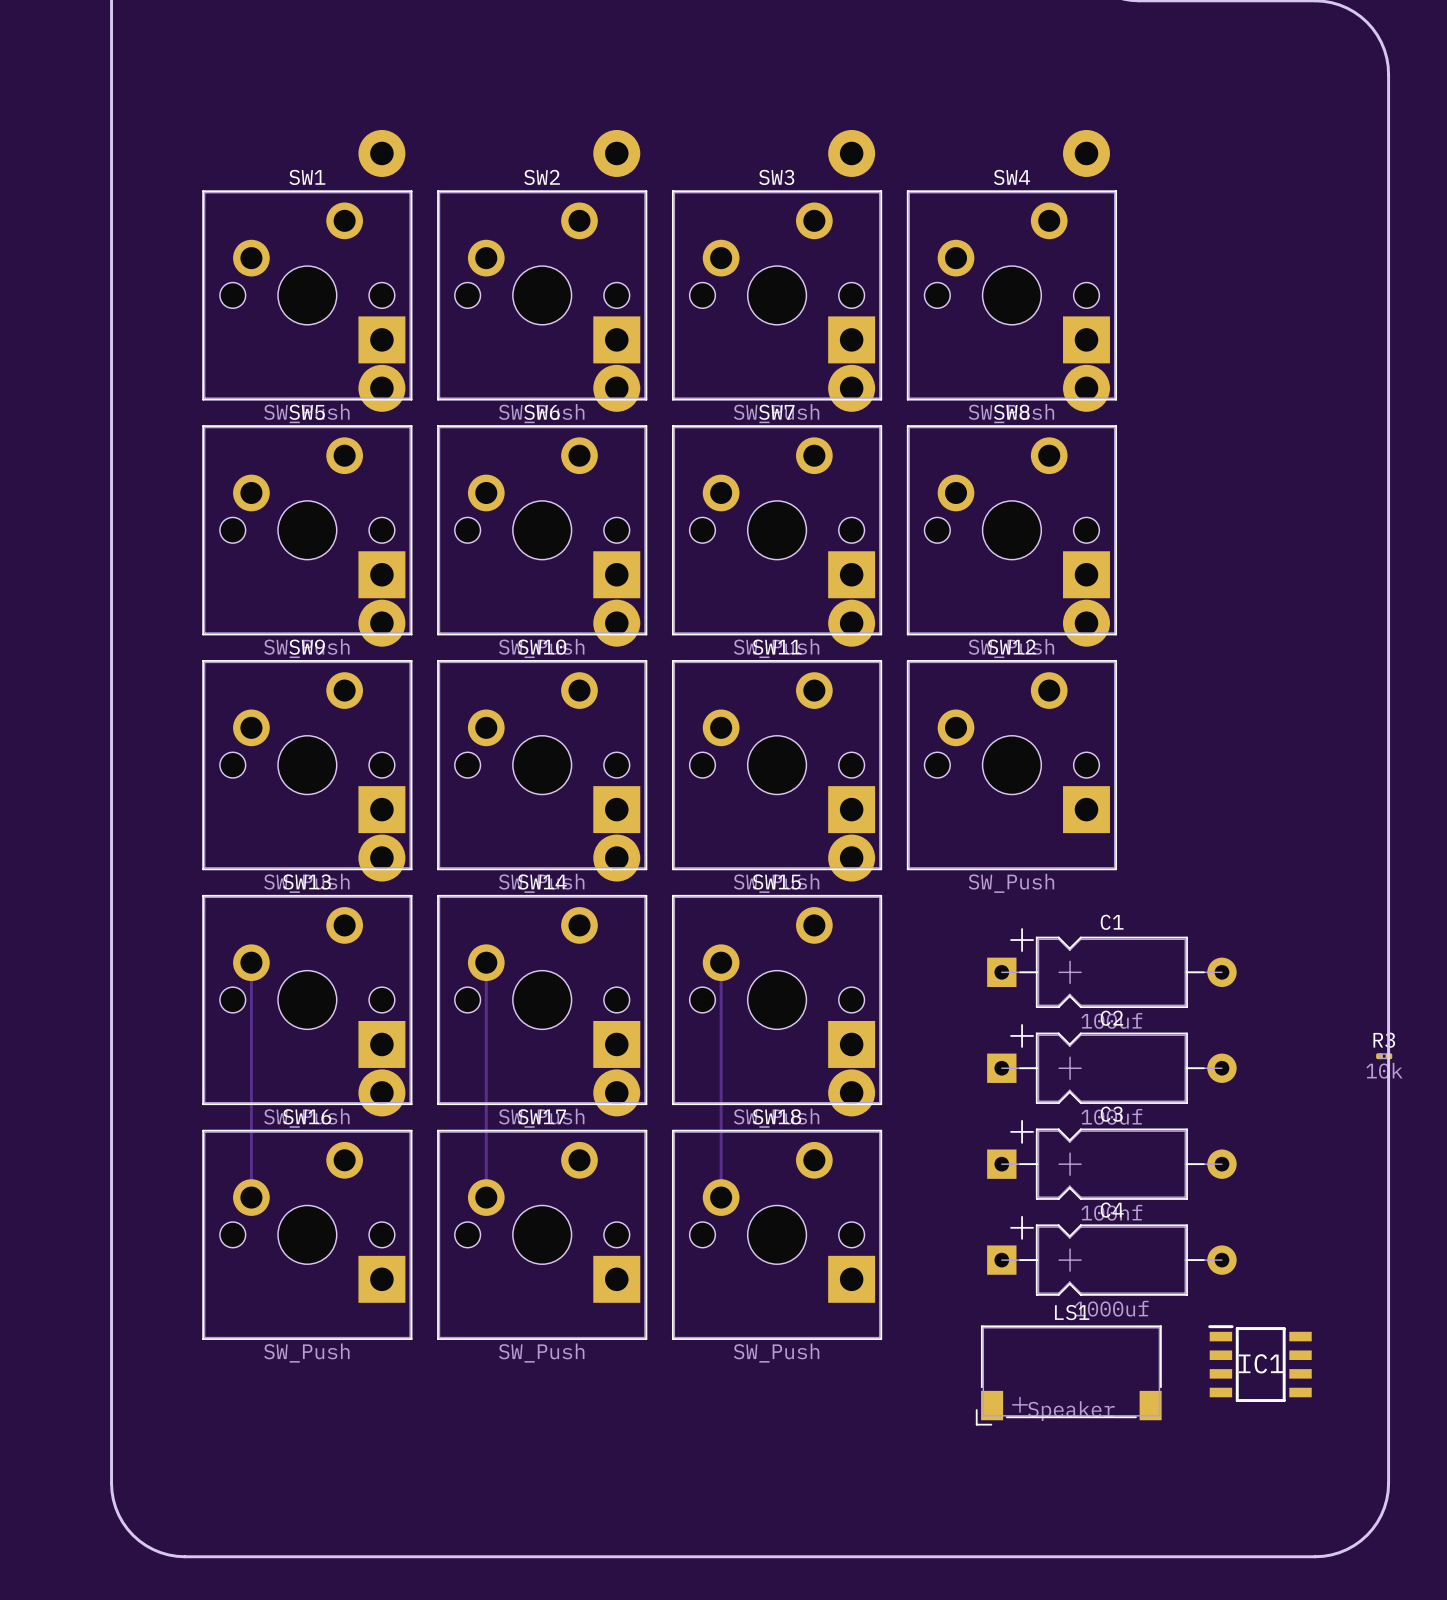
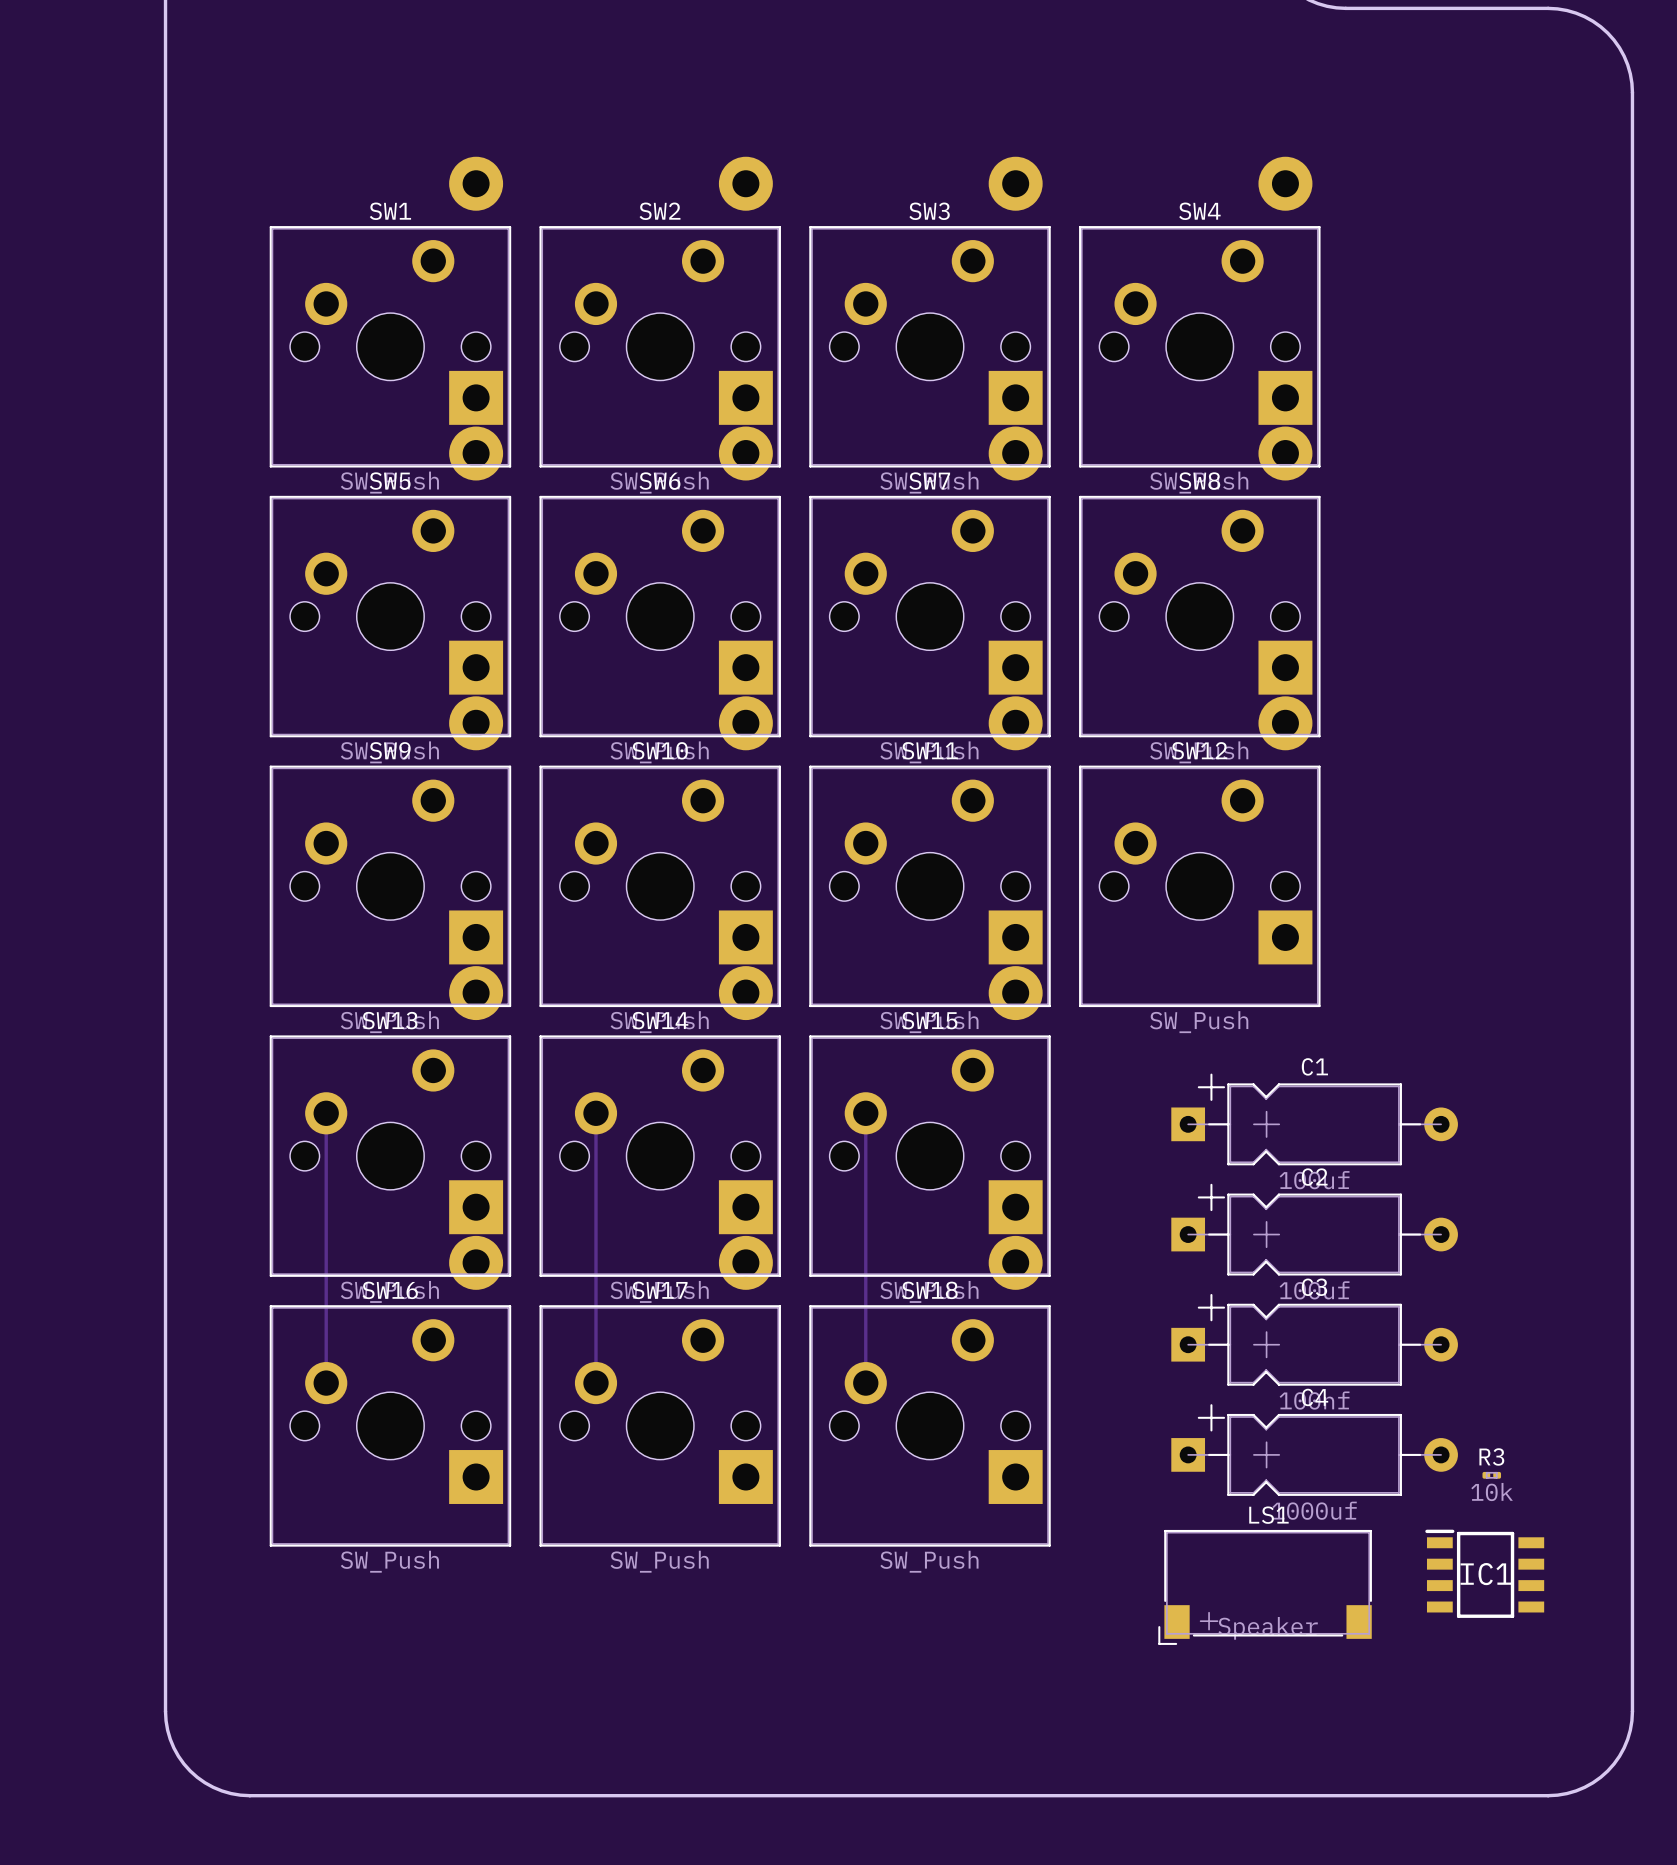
R3 position: (1384, 1056) -> (1491, 1475)

